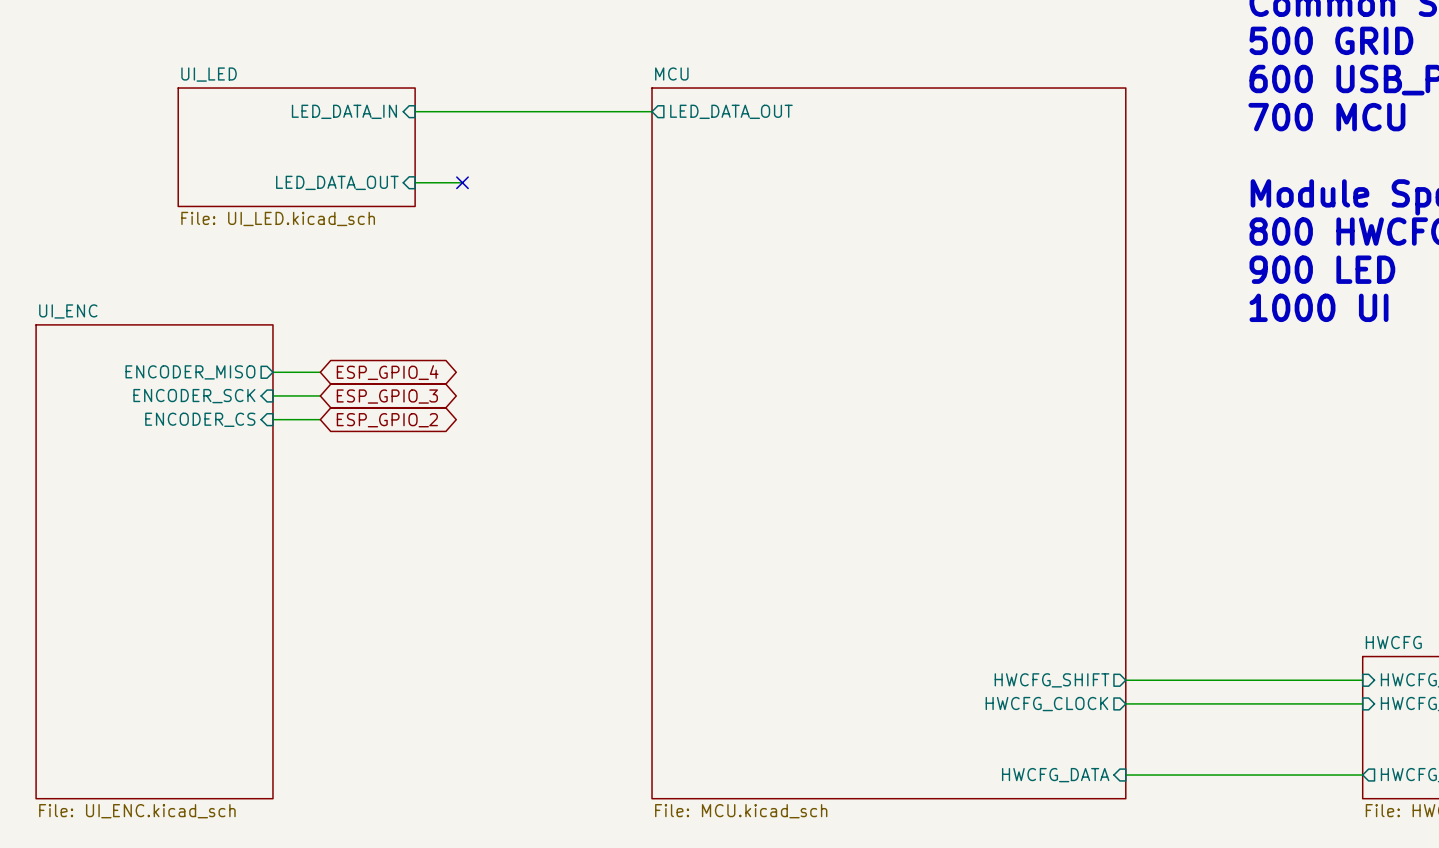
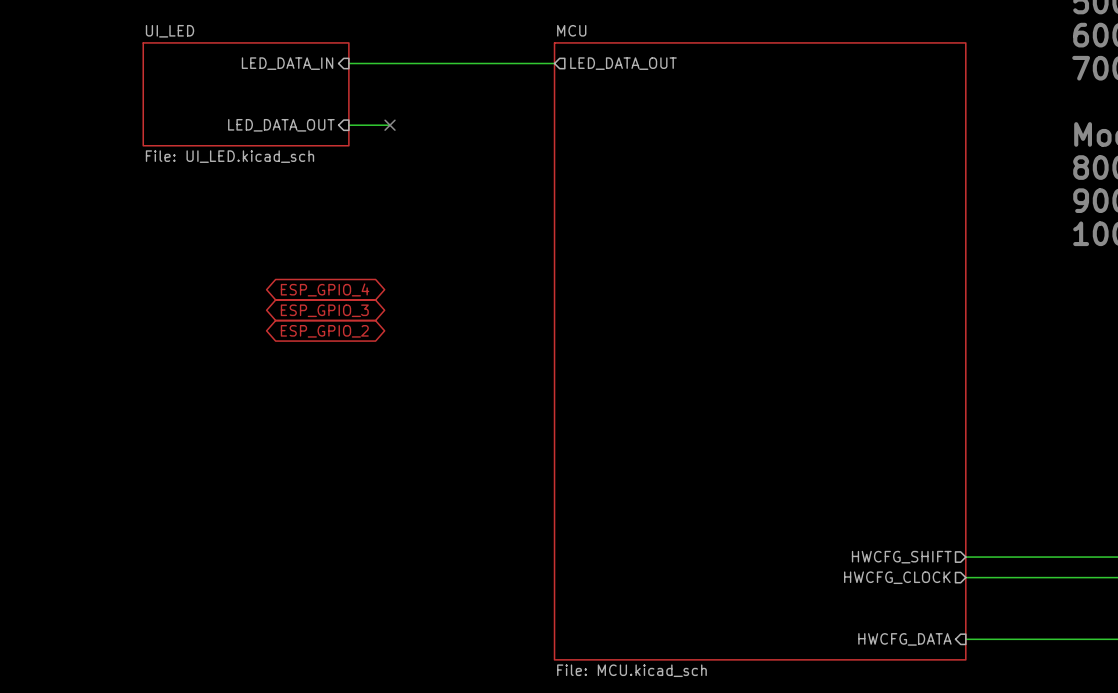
sheet pin: ENCODER_MISO (190, 372) -> none
wire: (272, 372) (320, 372) -> none
wire: (272, 395) (320, 395) -> none
sheet pin: ENCODER_SCK (194, 396) -> none
sheet pin: ENCODER_CS (200, 419) -> none
wire: (272, 419) (320, 419) -> none
sheet UI_ENC: File: UI_ENC.kicad_sch (154, 561) -> none

